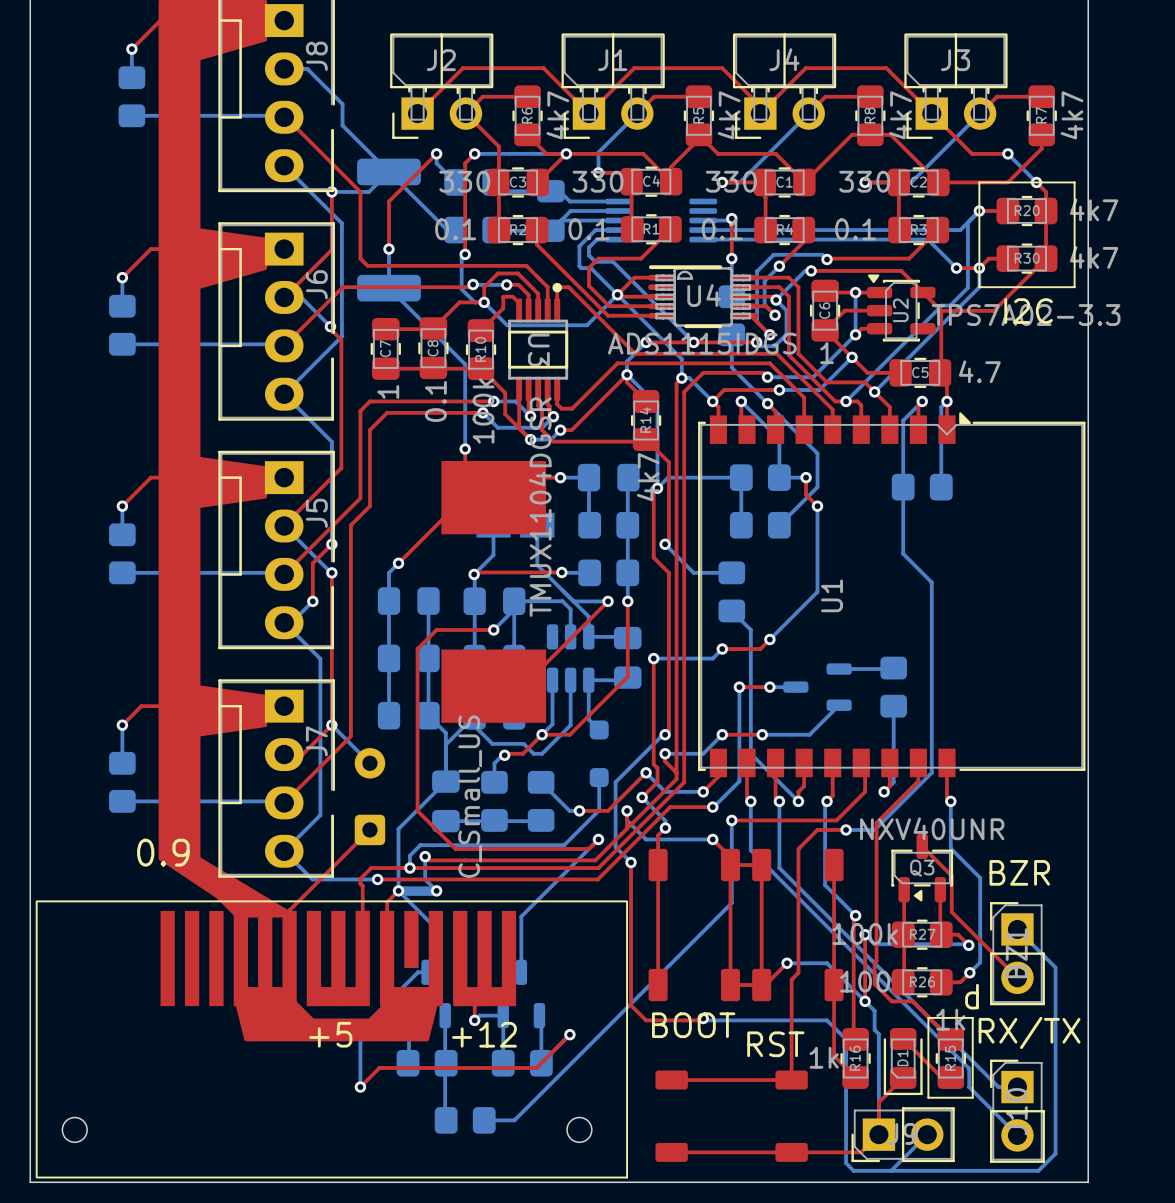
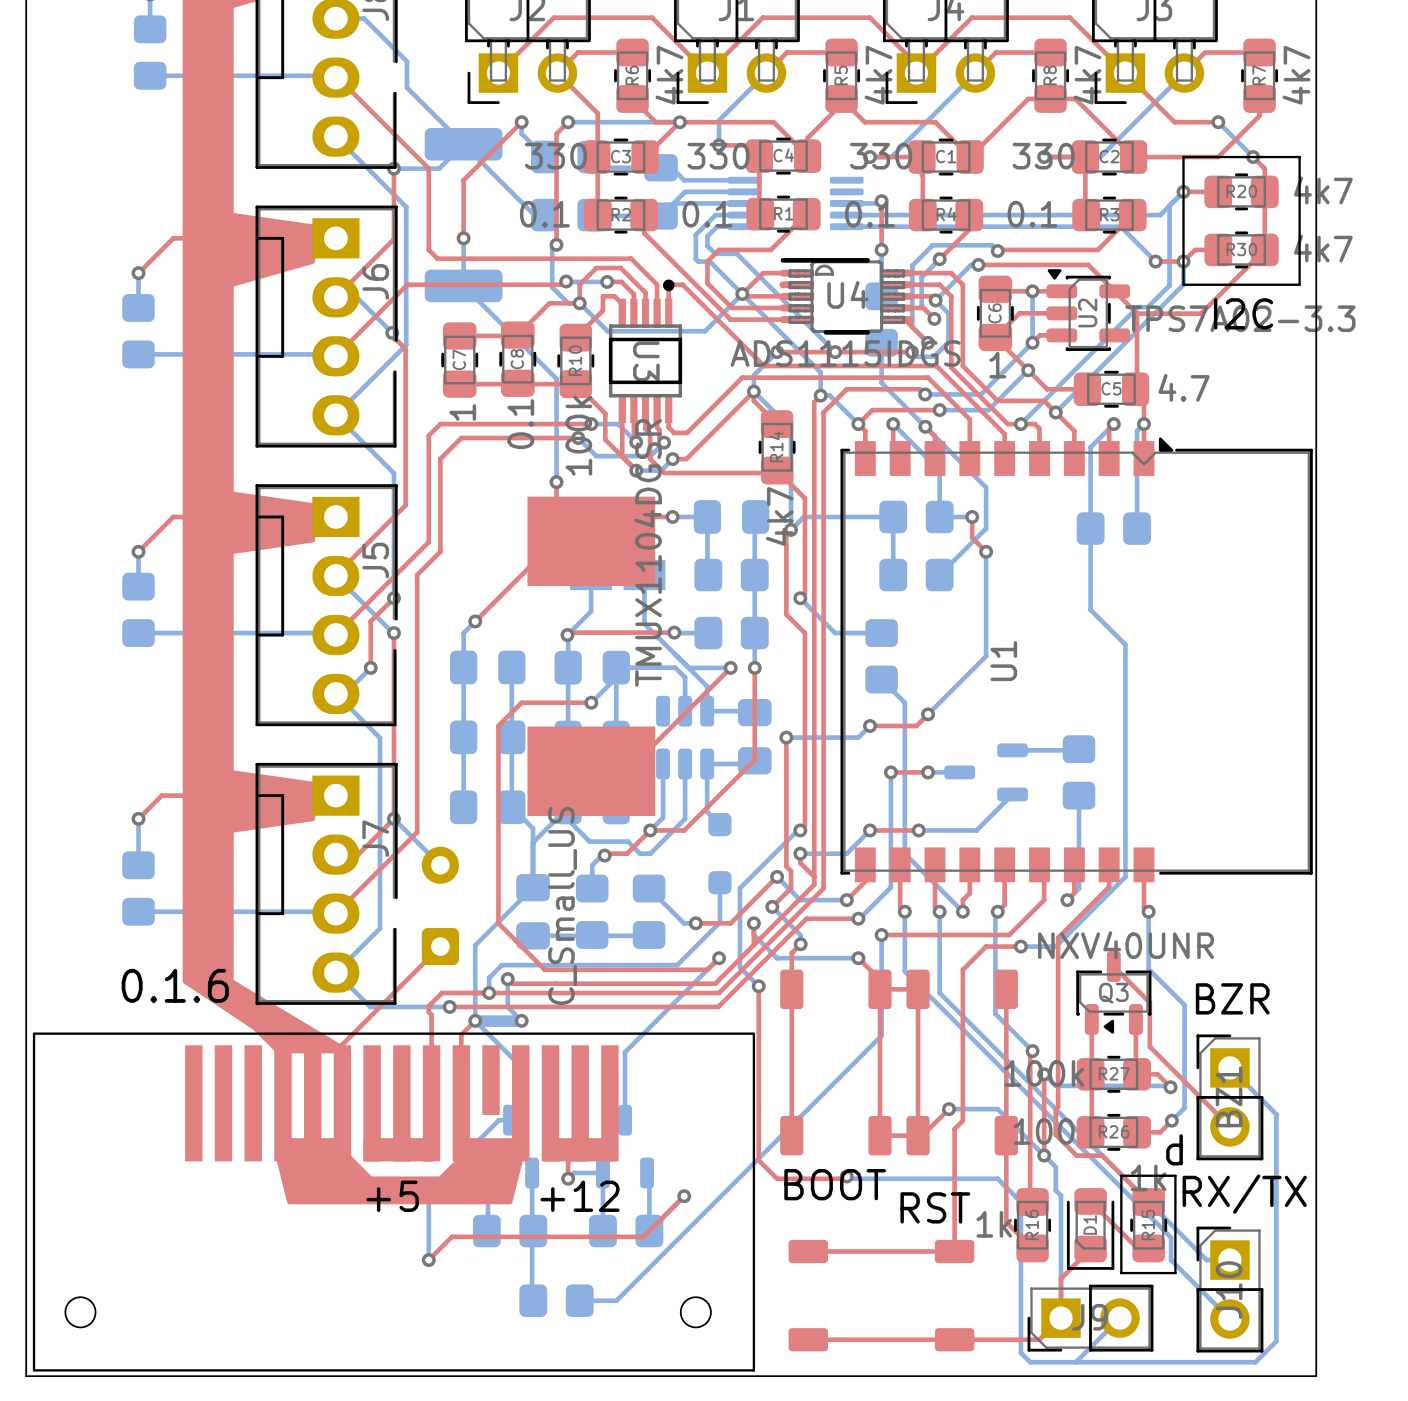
text: 0.9 (163, 852) -> none
text: none -> 0.1.6 (175, 985)

